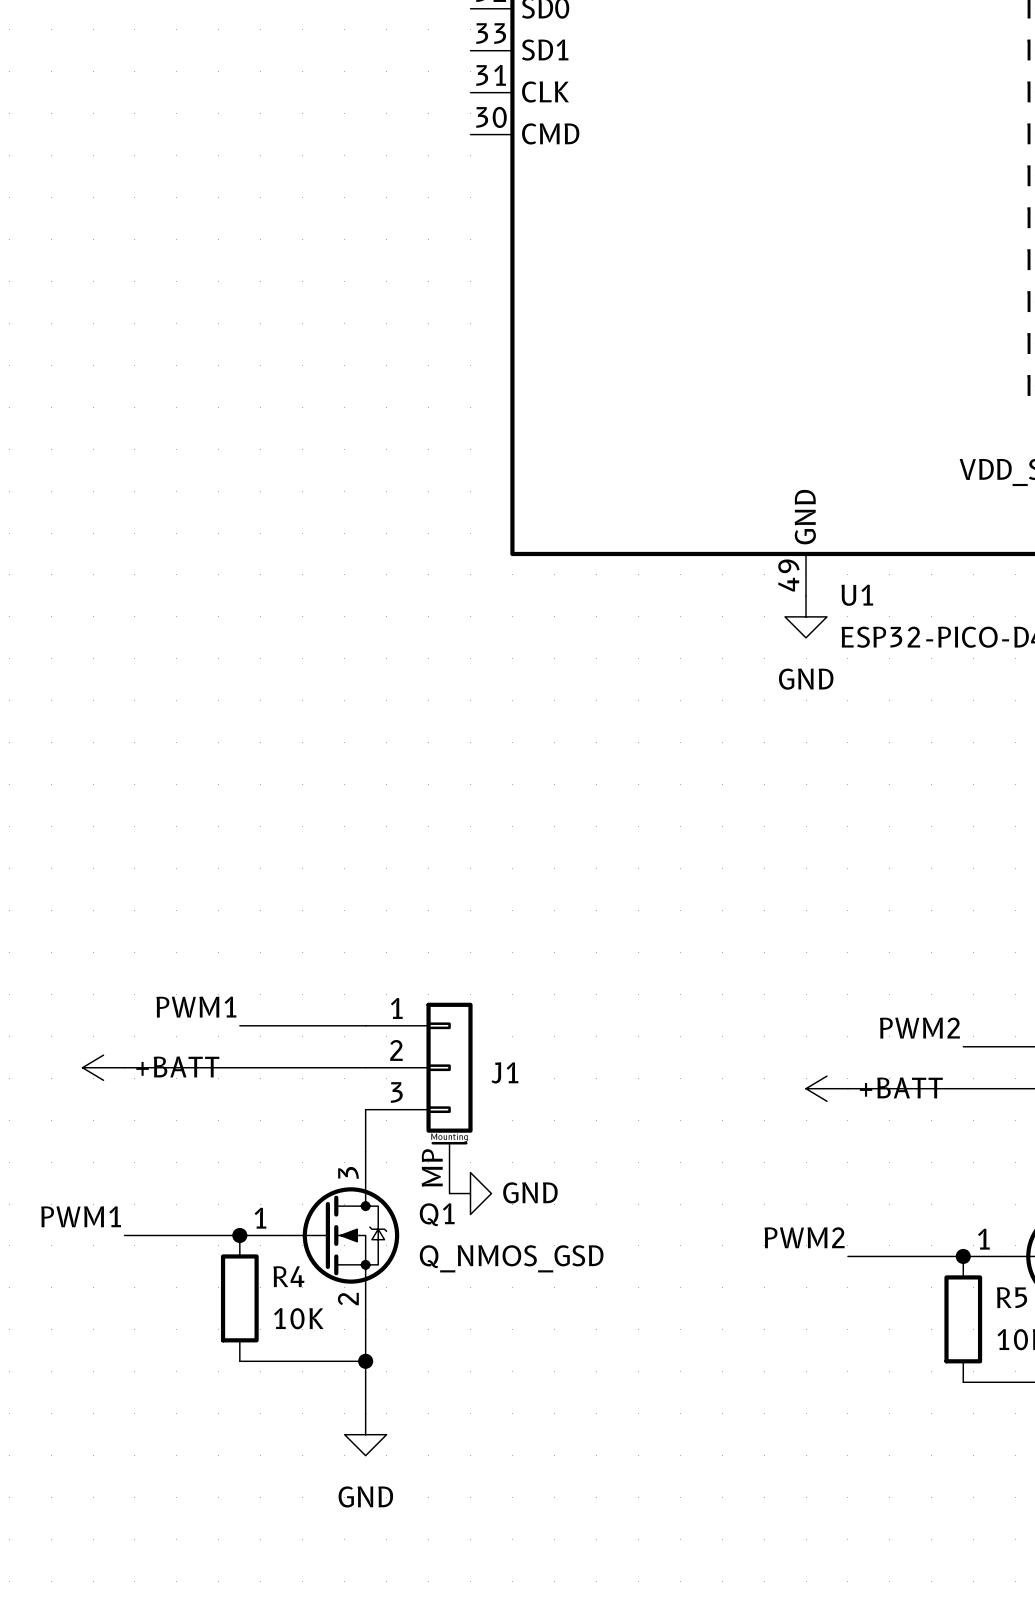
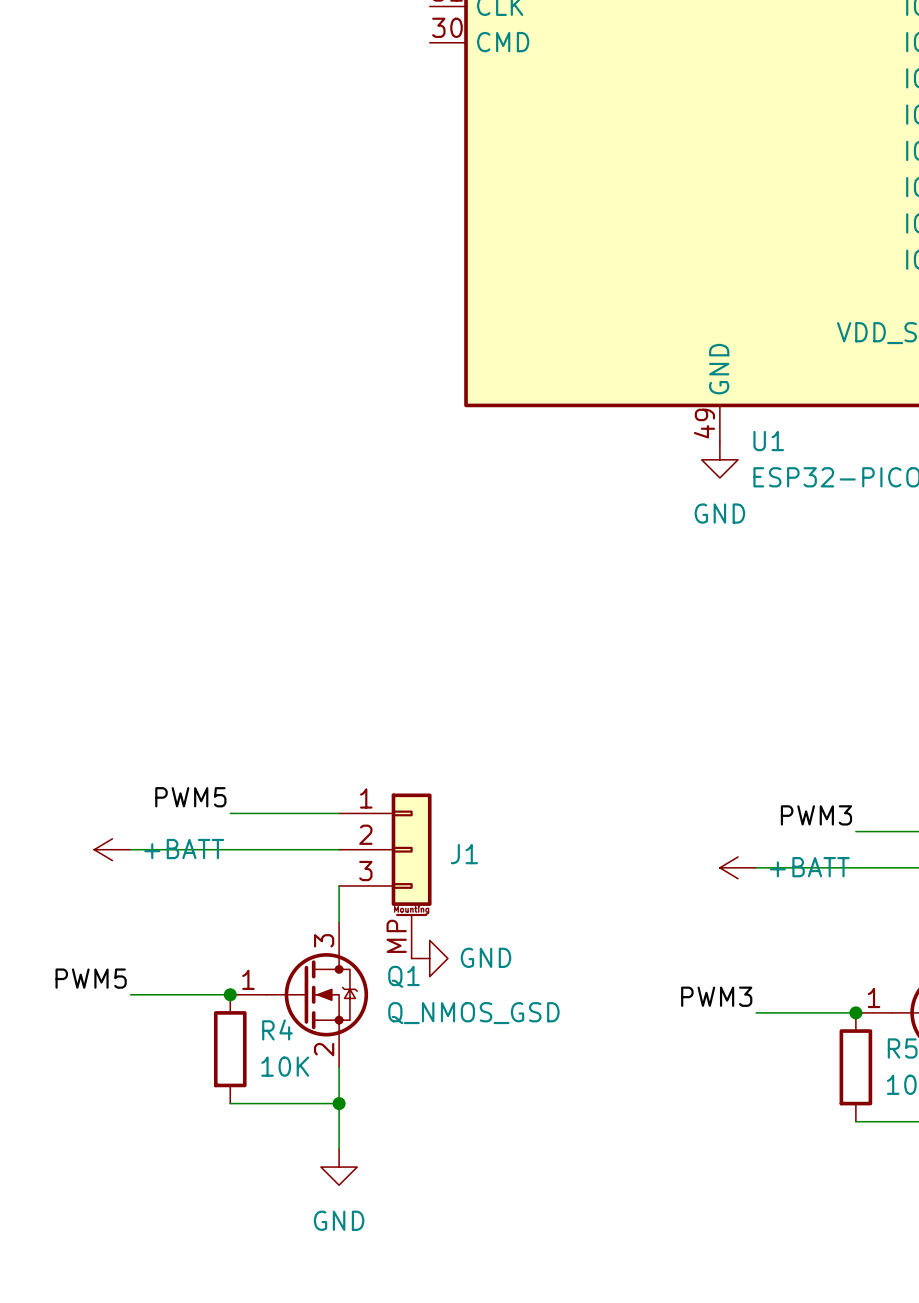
label: PWM1 (196, 1007) -> PWM5 (190, 797)
label: PWM2 (919, 1028) -> PWM3 (816, 815)
label: PWM1 (81, 1216) -> PWM5 (91, 978)
label: PWM2 (804, 1237) -> PWM3 (716, 996)

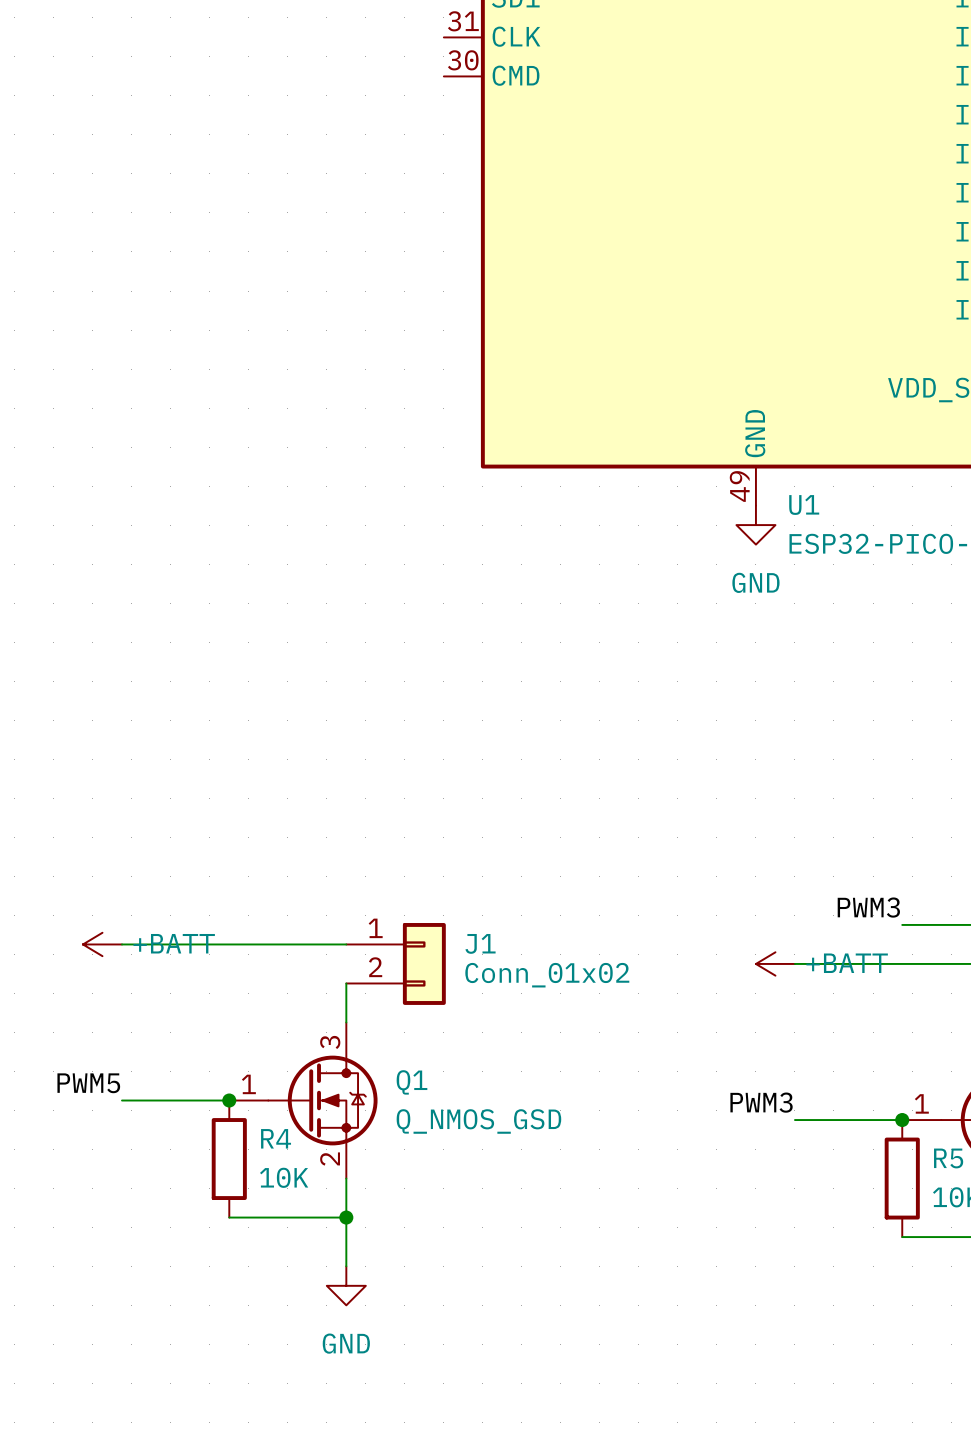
J1 symbol: [339, 793, 432, 959] -> [346, 923, 446, 1005]
label: PWM5 (190, 797) -> none
wire: (230, 813) (339, 813) -> none
J1 value: none -> Conn_01x02 (547, 975)
power symbol: GND (429, 958) -> none

